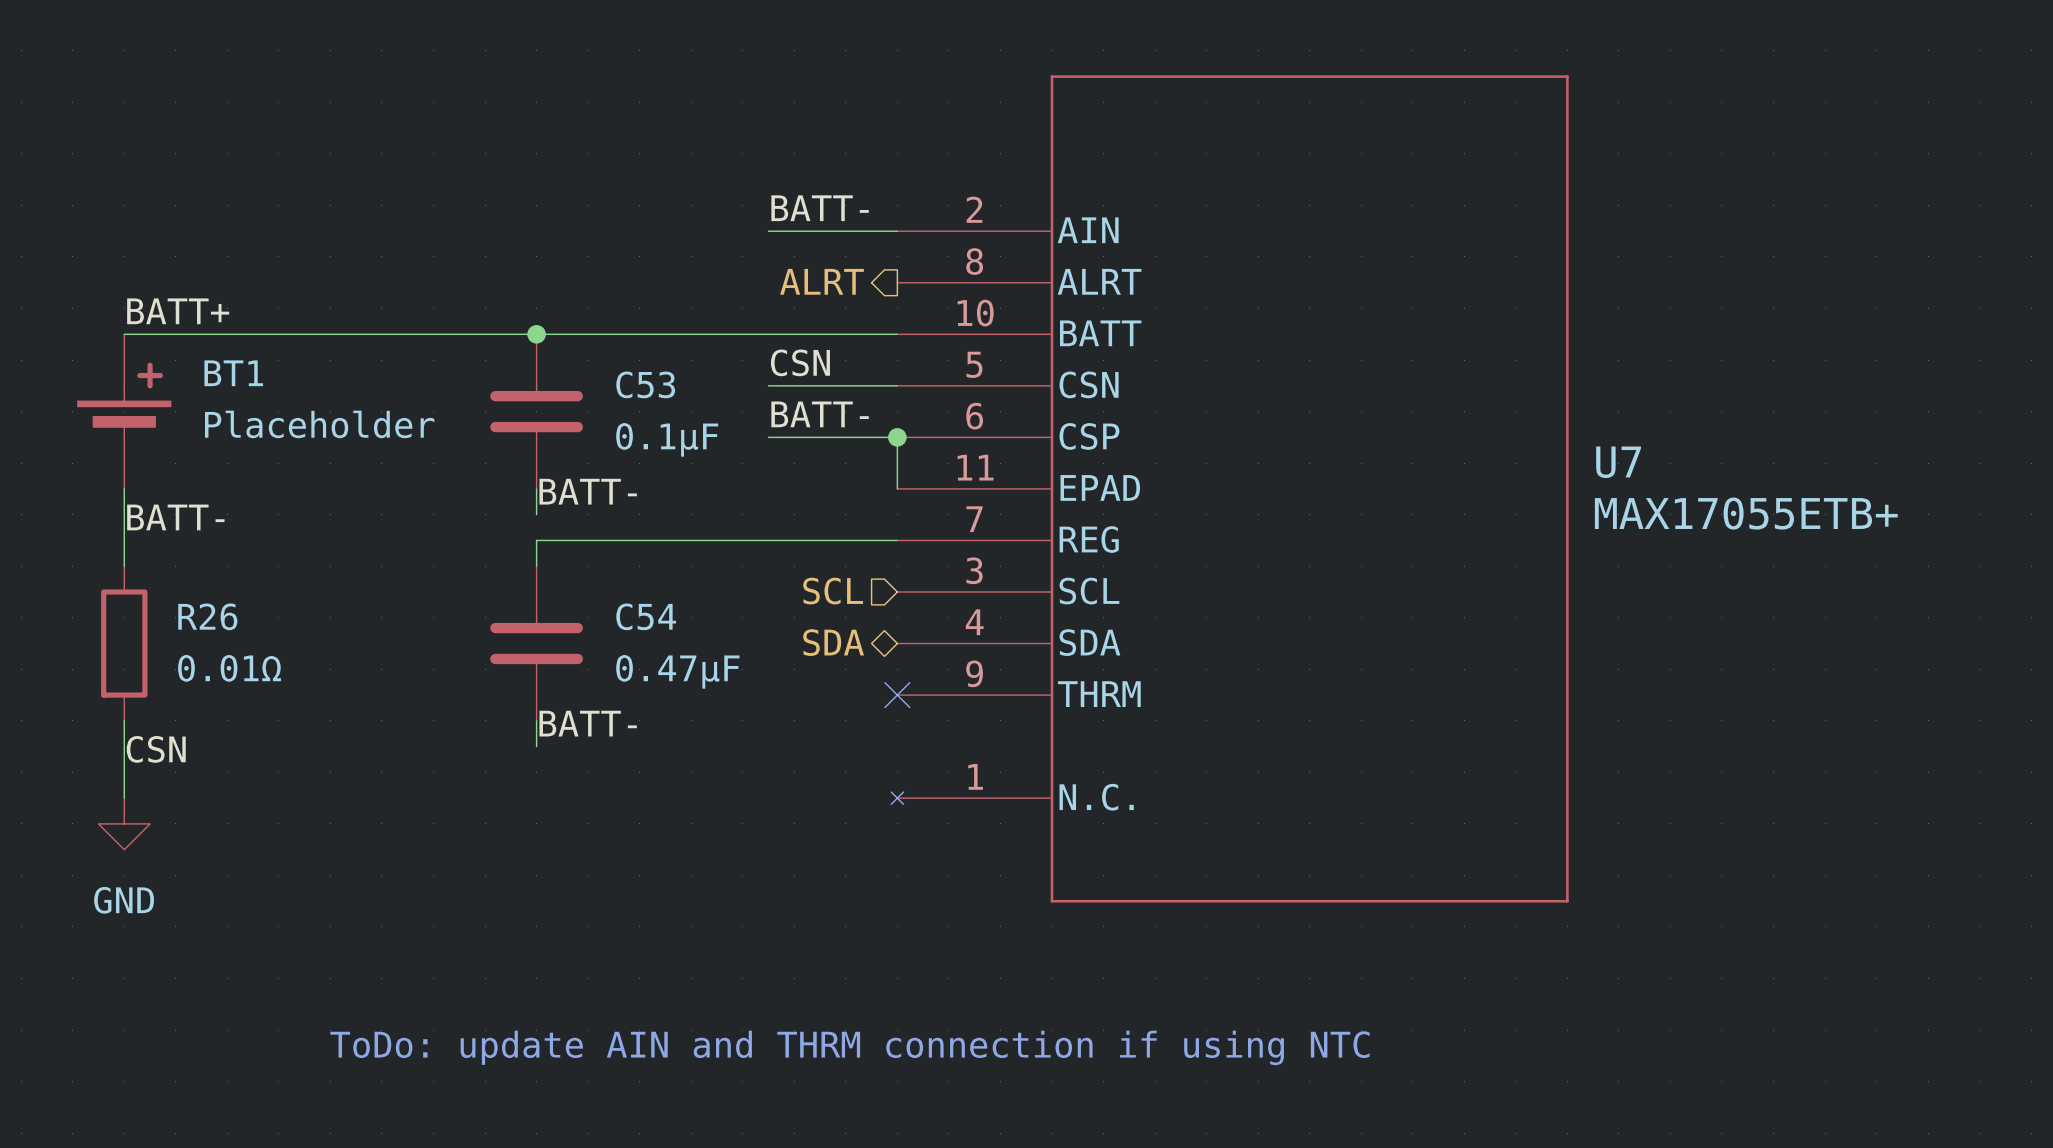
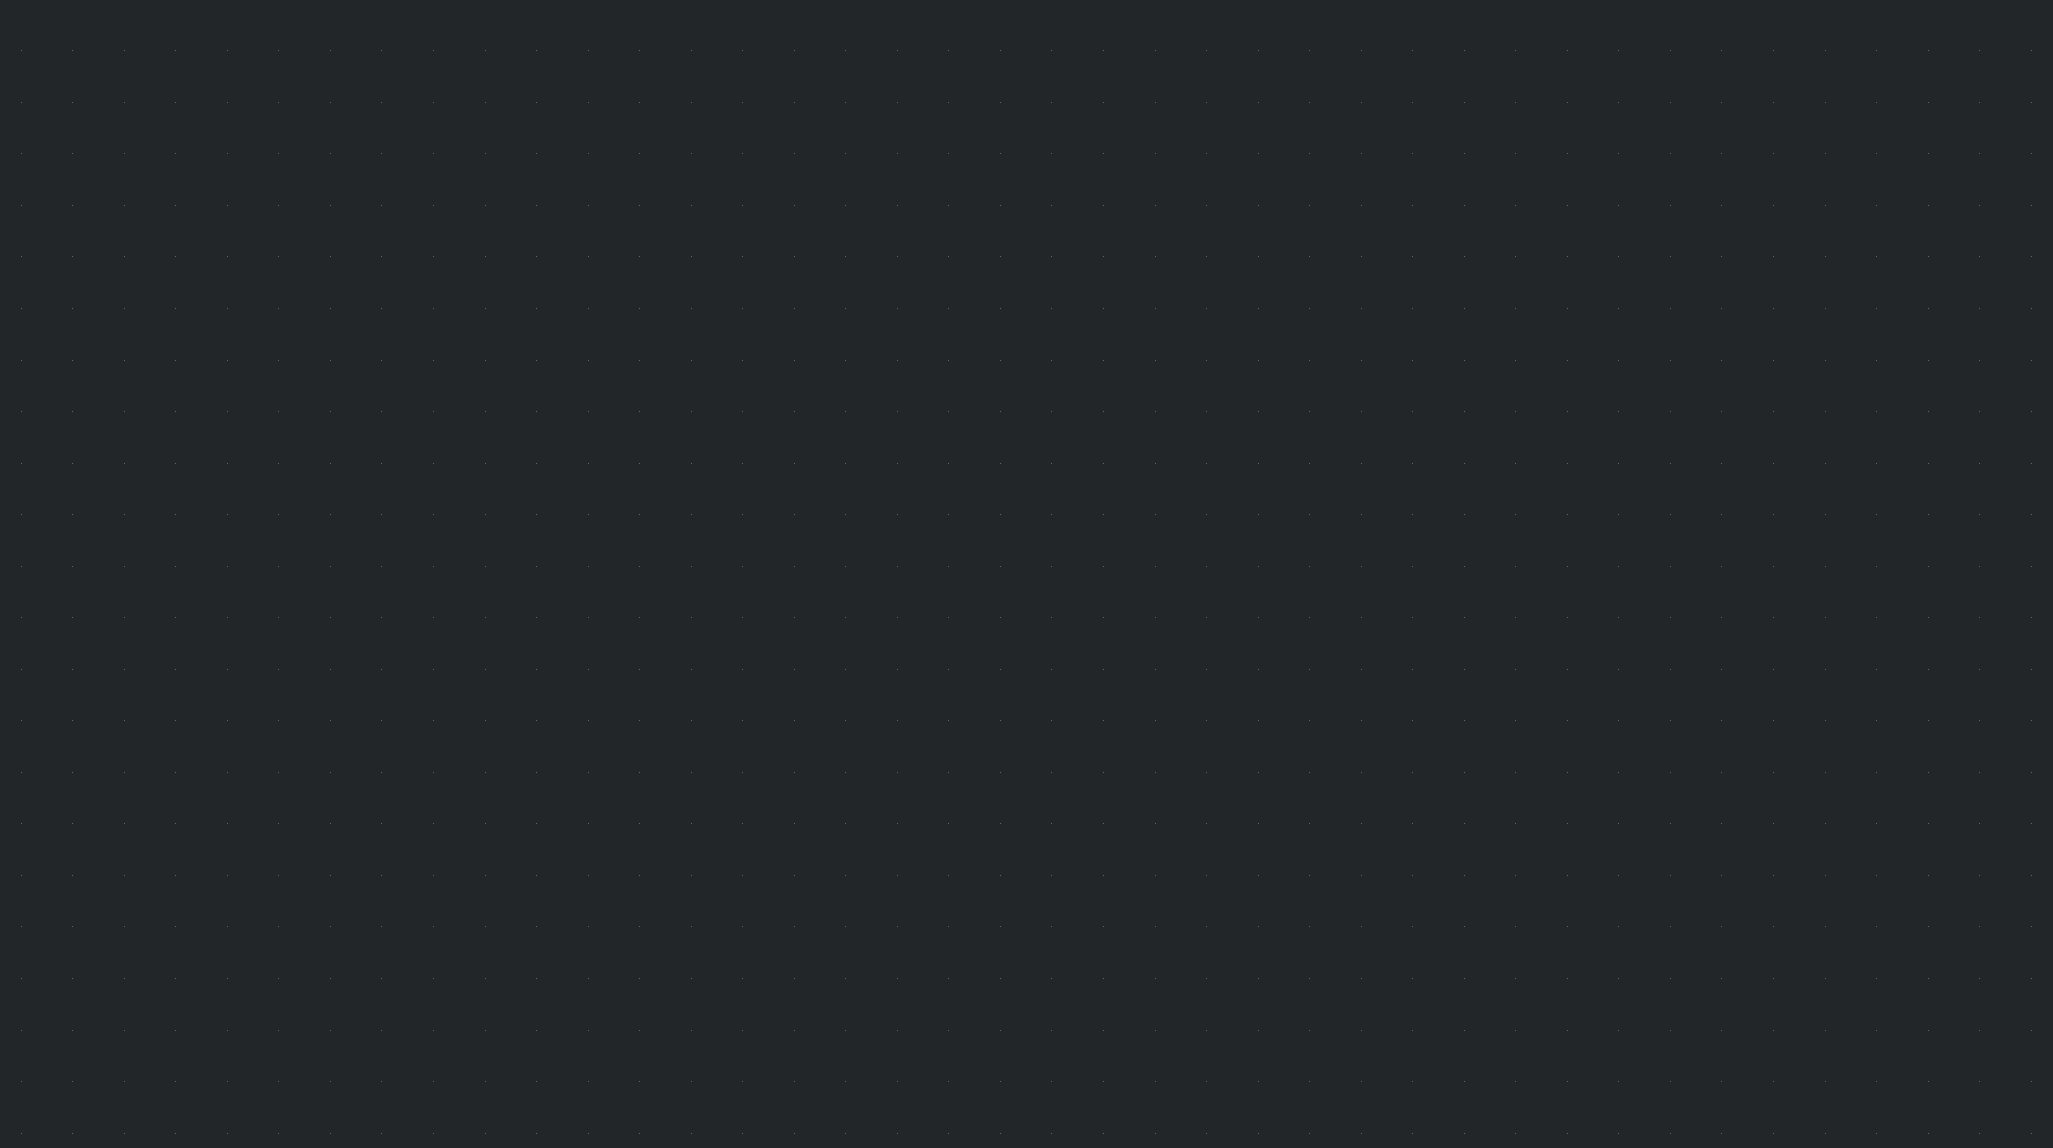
label: BATT- (820, 208) -> none
wire: (768, 231) (897, 231) -> none
hierarchical label: ALRT (821, 281) -> none
label: BATT+ (178, 311) -> none
wire: (124, 334) (897, 334) -> none
junction: (536, 334) -> none
label: CSN (800, 362) -> none
wire: (768, 385) (897, 385) -> none
BT1: Placeholder (124, 411) -> none
C53: 0.1µF (536, 411) -> none
label: BATT- (820, 414) -> none
wire: (768, 437) (897, 437) (897, 488) -> none
junction: (897, 437) -> none
wire: (124, 488) (124, 566) -> none
wire: (536, 488) (536, 514) -> none
U7: MAX17055ETB+ (1229, 488) -> none
label: BATT- (588, 491) -> none
label: BATT- (175, 517) -> none
wire: (897, 540) (536, 540) (536, 566) -> none
hierarchical label: SCL (833, 591) -> none
hierarchical label: SDA (833, 642) -> none
R26: 0.01Ω (124, 643) -> none
C54: 0.47µF (536, 643) -> none
no-connect mark: (897, 695) -> none
wire: (124, 720) (124, 798) -> none
wire: (536, 720) (536, 746) -> none
label: BATT- (588, 723) -> none
label: CSN (156, 749) -> none
power symbol: GND (124, 823) -> none
text: ToDo: update AIN and THRM connection if using NTC (850, 1047) -> none

